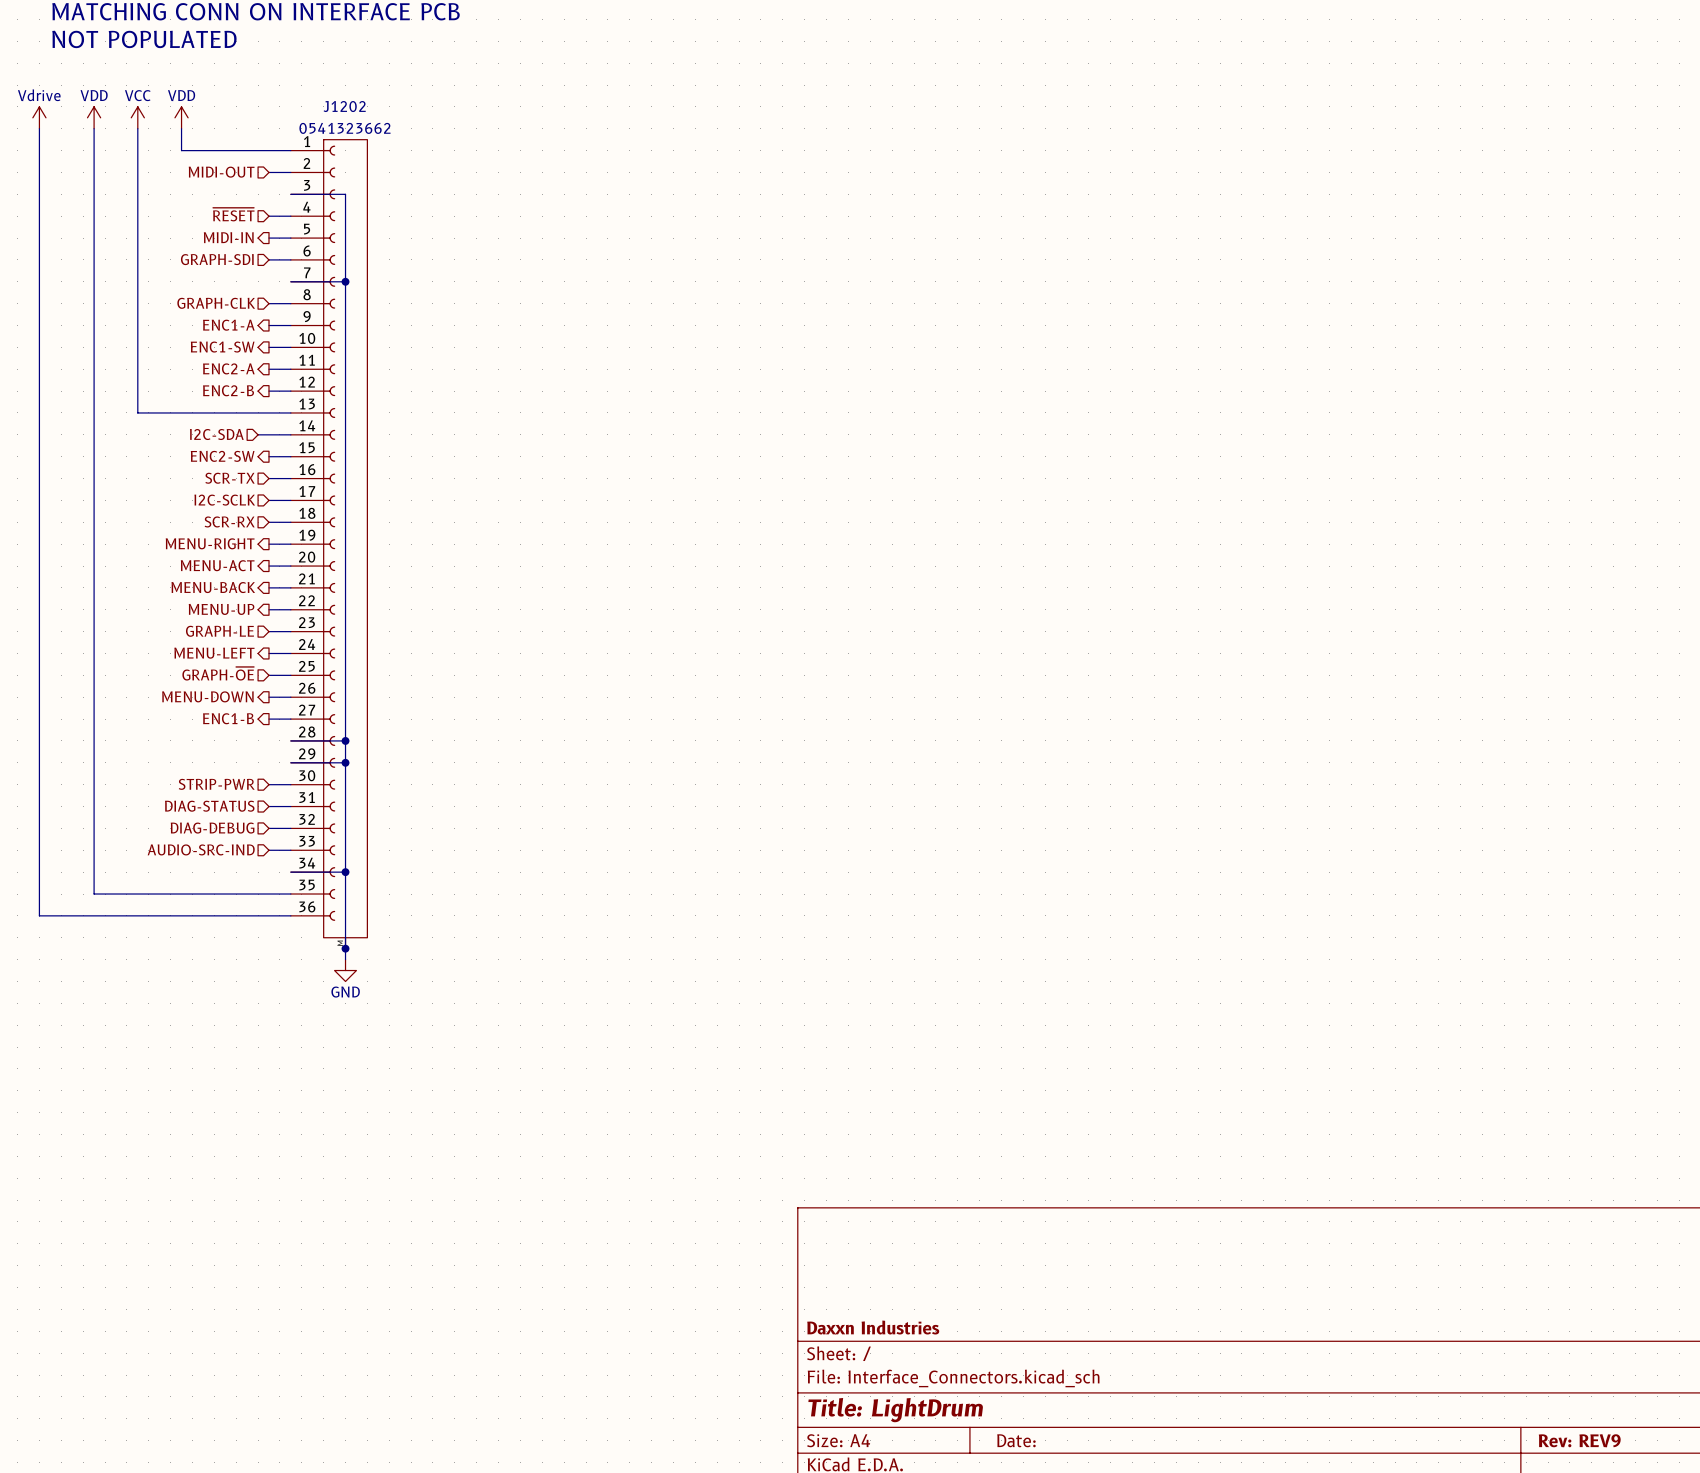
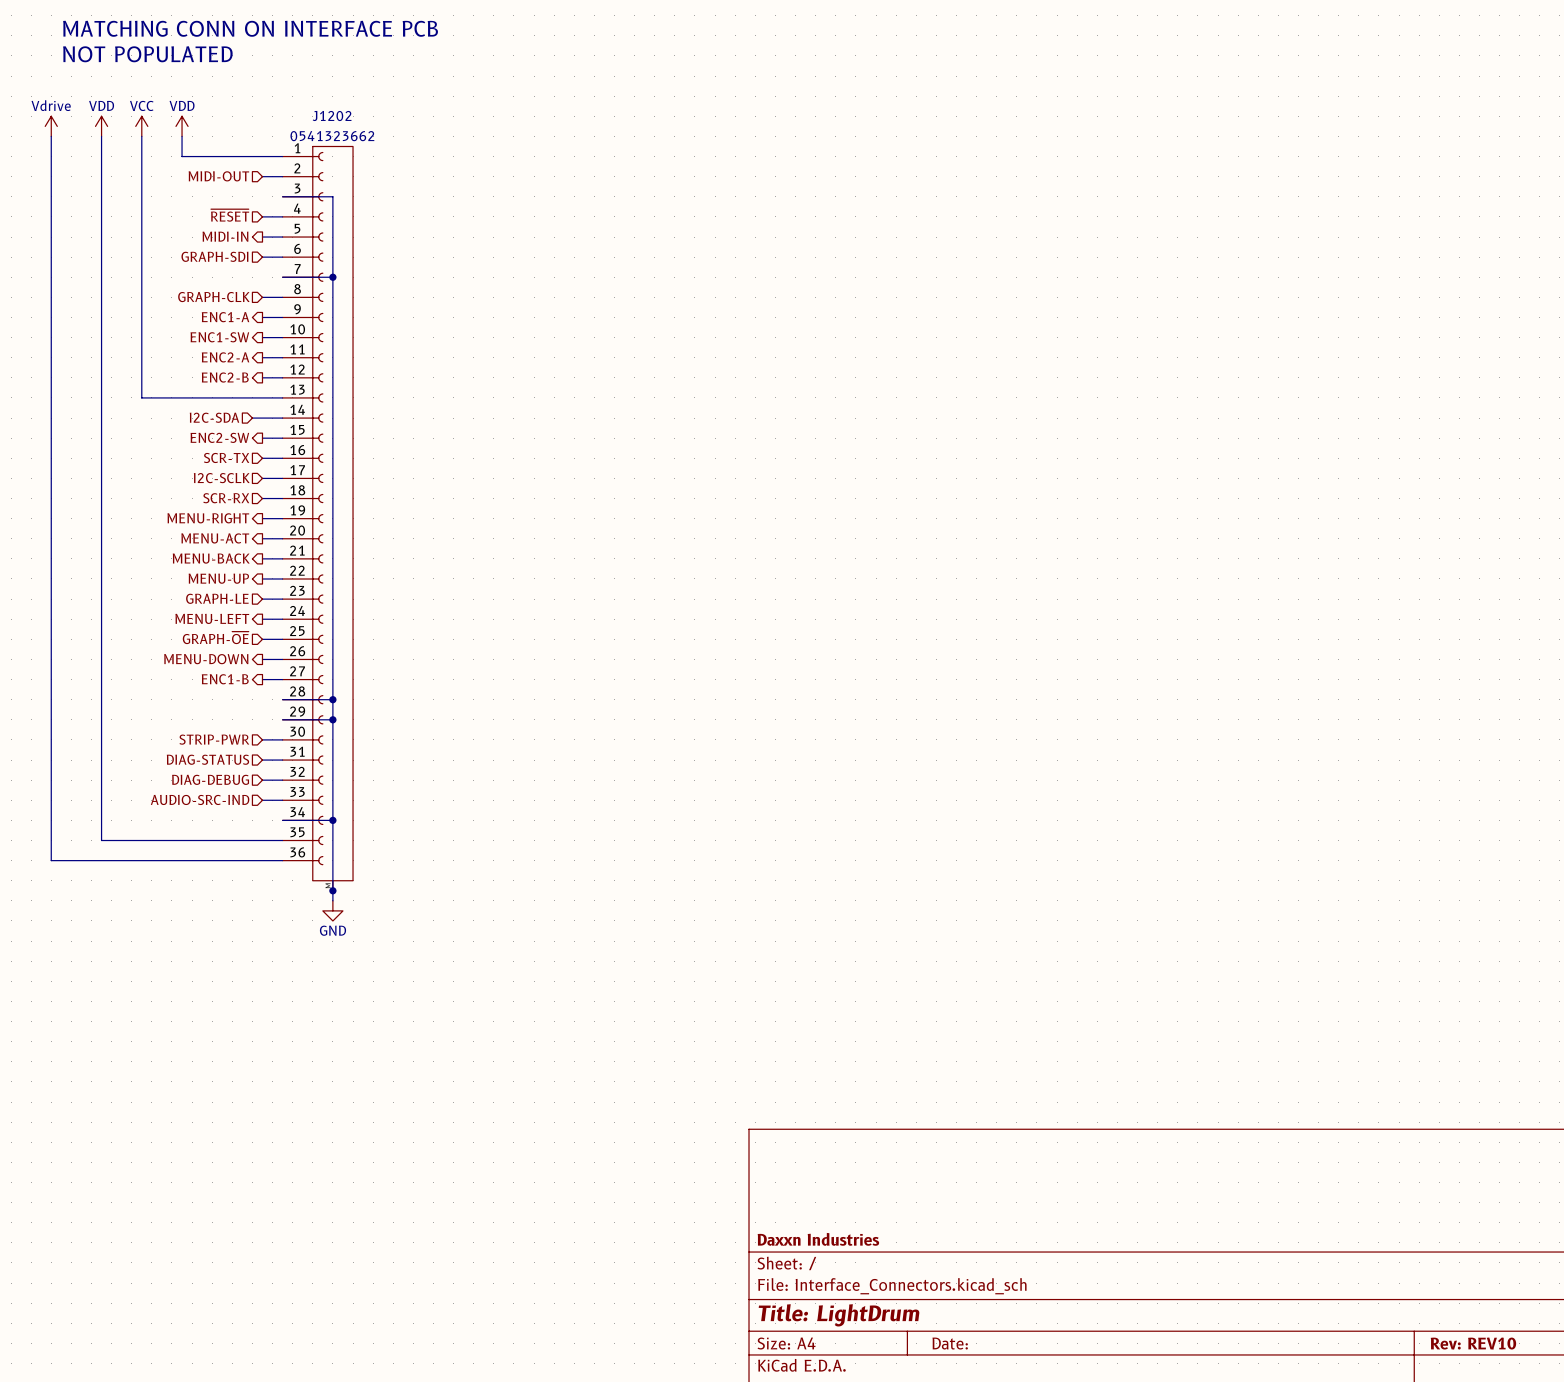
title block: Rev: REV9 (1579, 1440) -> Rev: REV10 (1473, 1343)

